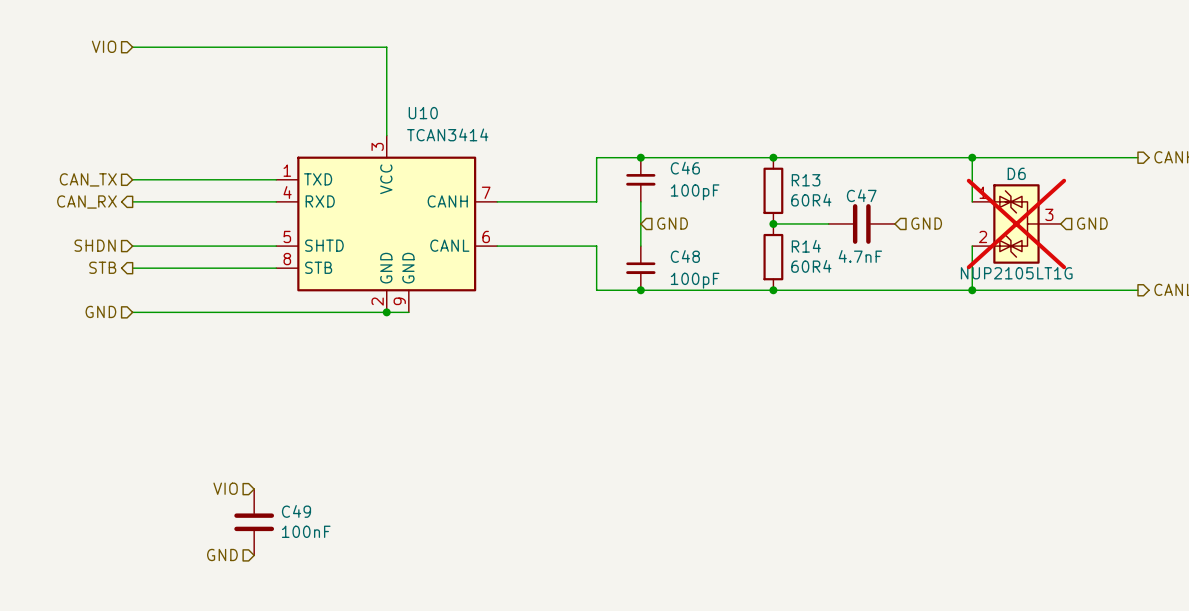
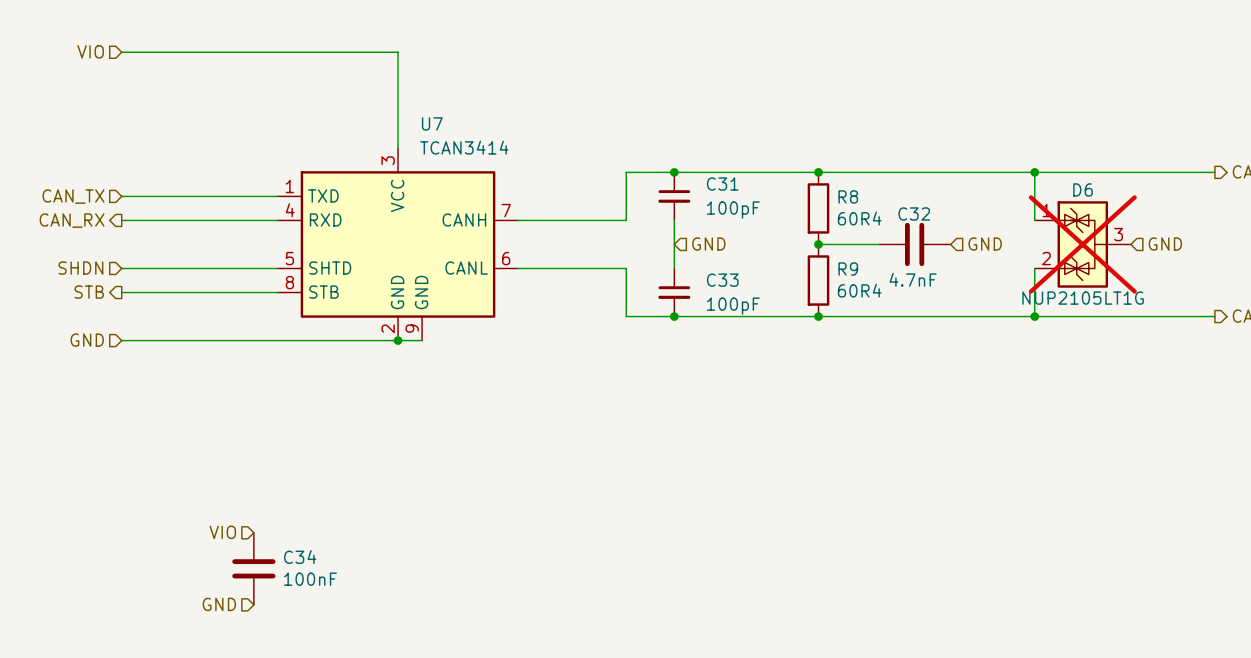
U10 name: U10 (423, 113) -> U7 (432, 123)
C46 name: C46 (685, 168) -> C31 (722, 184)
R13 name: R13 (806, 180) -> R8 (848, 196)
C47 name: C47 (861, 195) -> C32 (914, 213)
R14 name: R14 (806, 246) -> R9 (848, 269)
C48 name: C48 (685, 256) -> C33 (722, 280)
C49 name: C49 (296, 511) -> C34 (300, 557)

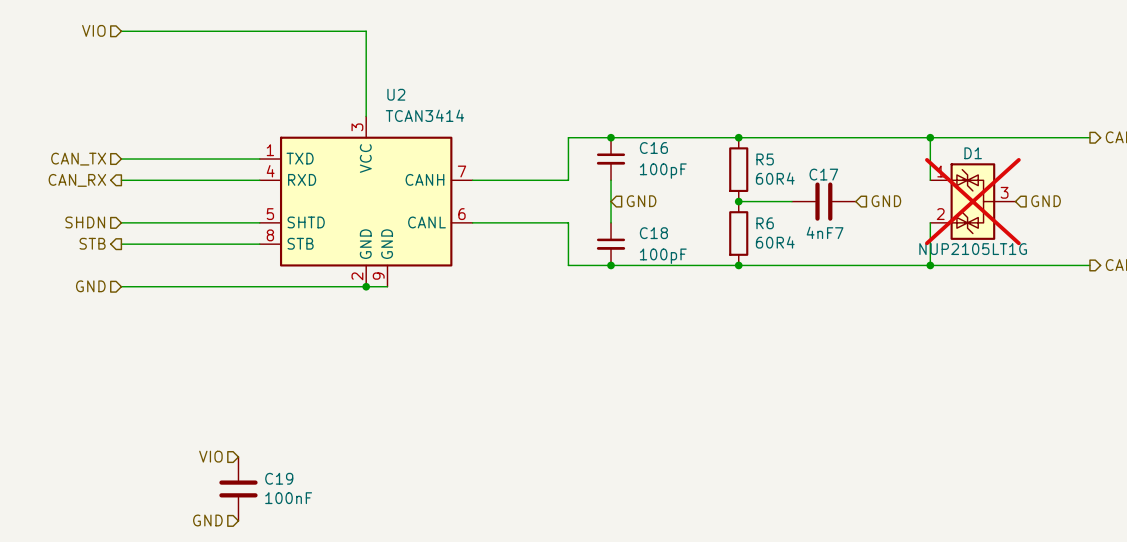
U7 name: U7 (432, 123) -> U2 (396, 94)
C31 name: C31 (722, 184) -> C16 (653, 148)
D6 name: D6 (1083, 189) -> D1 (973, 153)
R8 name: R8 (848, 196) -> R5 (765, 159)
C32 name: C32 (914, 213) -> C17 (823, 174)
R9 name: R9 (848, 269) -> R6 (765, 223)
C32 value: 4.7nF (913, 279) -> 4nF7 (825, 232)
C33 name: C33 (722, 280) -> C18 (653, 233)
C34 name: C34 (300, 557) -> C19 (279, 478)

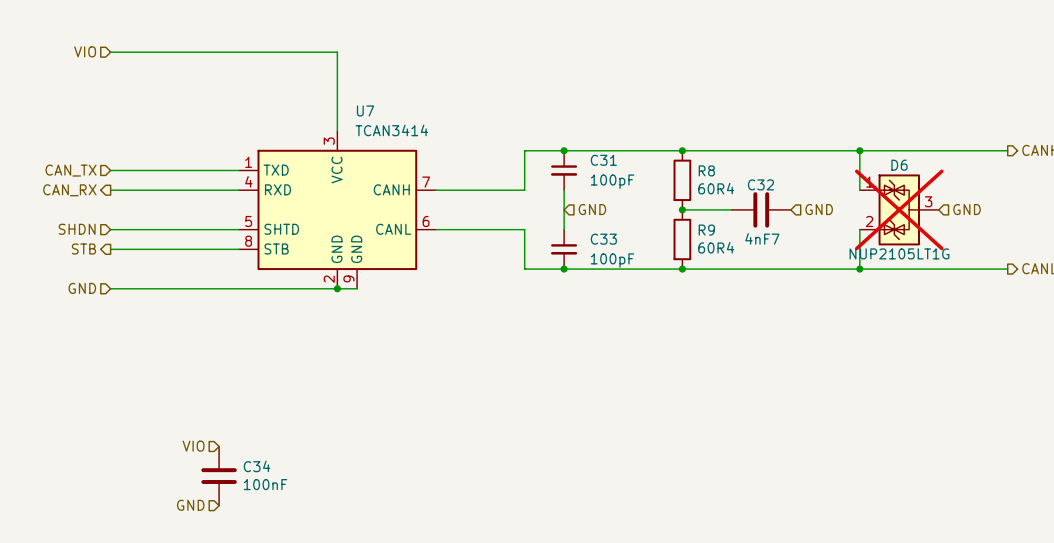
U2 name: U2 (396, 94) -> U7 (365, 110)
C16 name: C16 (653, 148) -> C31 (603, 160)
D1 name: D1 (973, 153) -> D6 (899, 165)
R5 name: R5 (765, 159) -> R8 (706, 170)
C17 name: C17 (823, 174) -> C32 (760, 184)
R6 name: R6 (765, 223) -> R9 (706, 230)
C18 name: C18 (653, 233) -> C33 (603, 239)
C19 name: C19 (279, 478) -> C34 (257, 466)

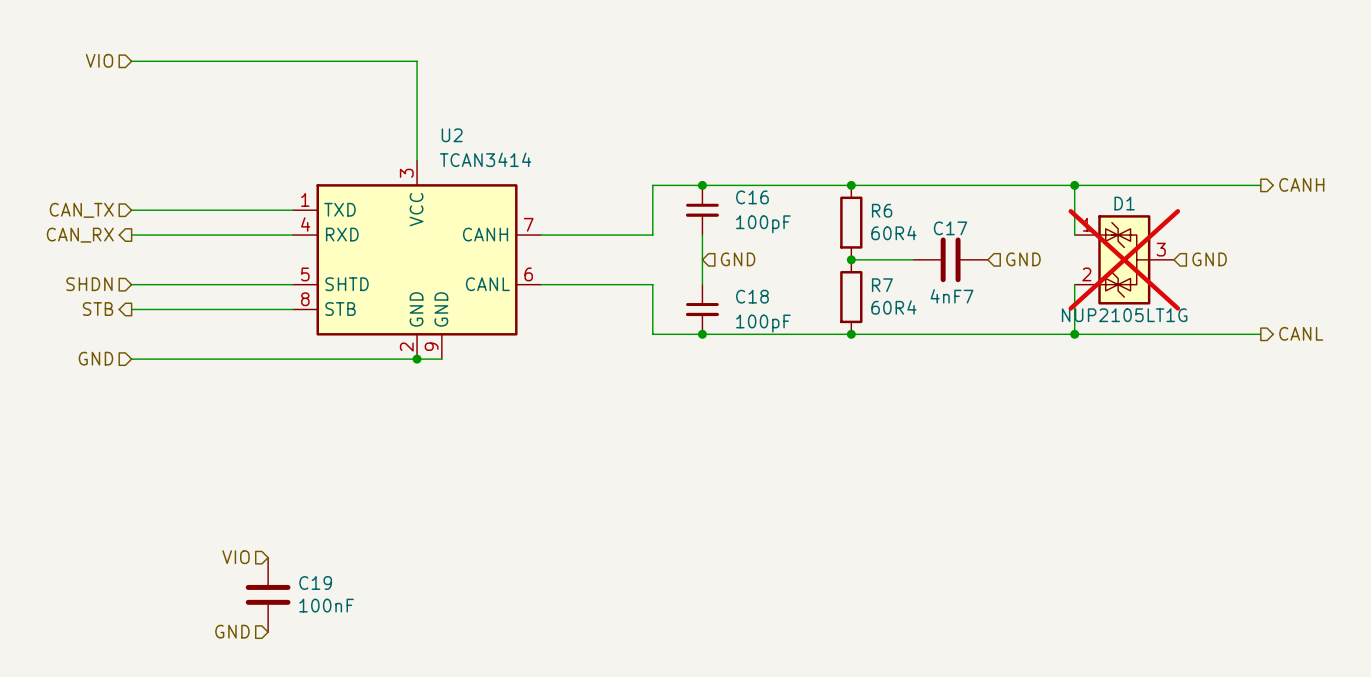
U7 name: U7 (365, 110) -> U2 (452, 135)
C31 name: C31 (603, 160) -> C16 (752, 197)
D6 name: D6 (899, 165) -> D1 (1124, 203)
R8 name: R8 (706, 170) -> R6 (882, 210)
C32 name: C32 (760, 184) -> C17 (950, 228)
R9 name: R9 (706, 230) -> R7 (882, 285)
C33 name: C33 (603, 239) -> C18 (752, 296)
C34 name: C34 (257, 466) -> C19 (315, 583)

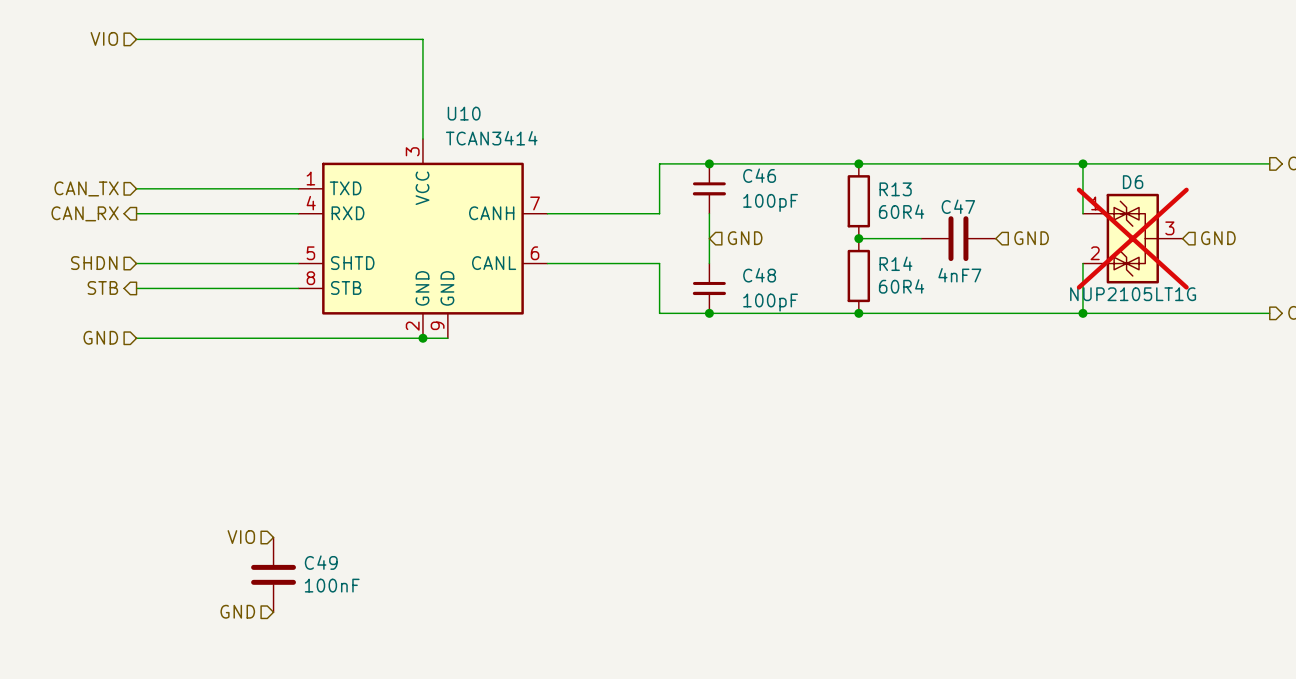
U2 name: U2 (452, 135) -> U10 (464, 113)
C16 name: C16 (752, 197) -> C46 (759, 175)
D1 name: D1 (1124, 203) -> D6 (1133, 182)
R6 name: R6 (882, 210) -> R13 (895, 189)
C17 name: C17 (950, 228) -> C47 (958, 206)
R7 name: R7 (882, 285) -> R14 (895, 263)
C18 name: C18 (752, 296) -> C48 (759, 275)
C19 name: C19 (315, 583) -> C49 (321, 562)

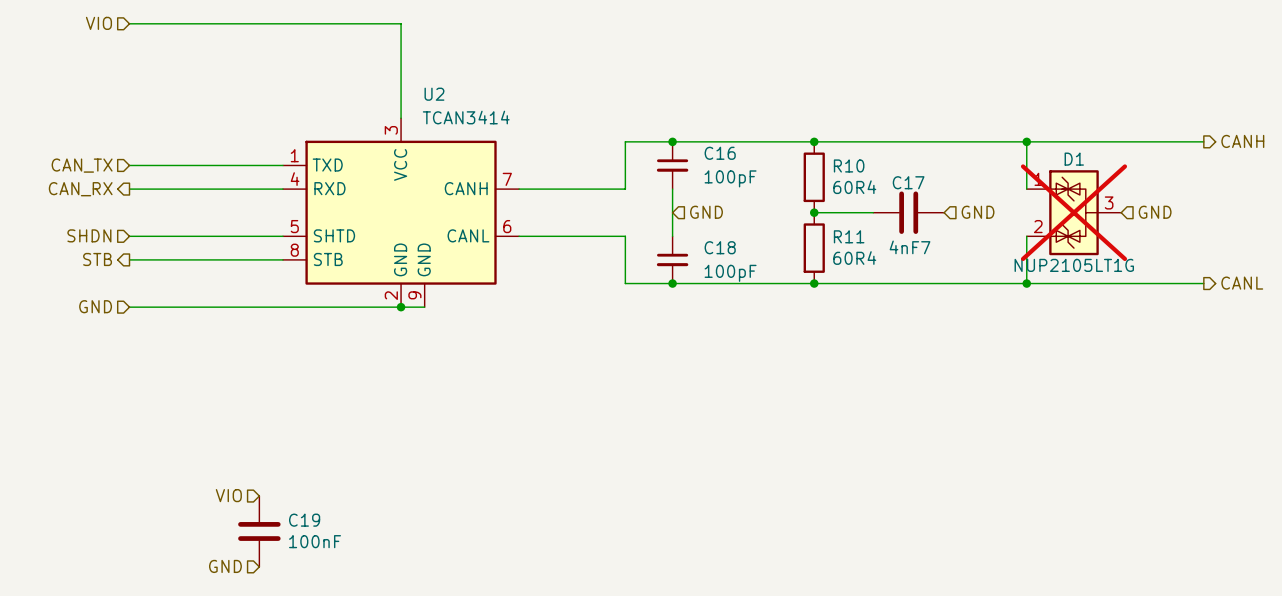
U10 name: U10 (464, 113) -> U2 (434, 94)
C46 name: C46 (759, 175) -> C16 (720, 153)
D6 name: D6 (1133, 182) -> D1 (1074, 159)
R13 name: R13 (895, 189) -> R10 (849, 165)
C47 name: C47 (958, 206) -> C17 (908, 182)
R14 name: R14 (895, 263) -> R11 (849, 236)
C48 name: C48 (759, 275) -> C18 (720, 247)
C49 name: C49 (321, 562) -> C19 (304, 520)

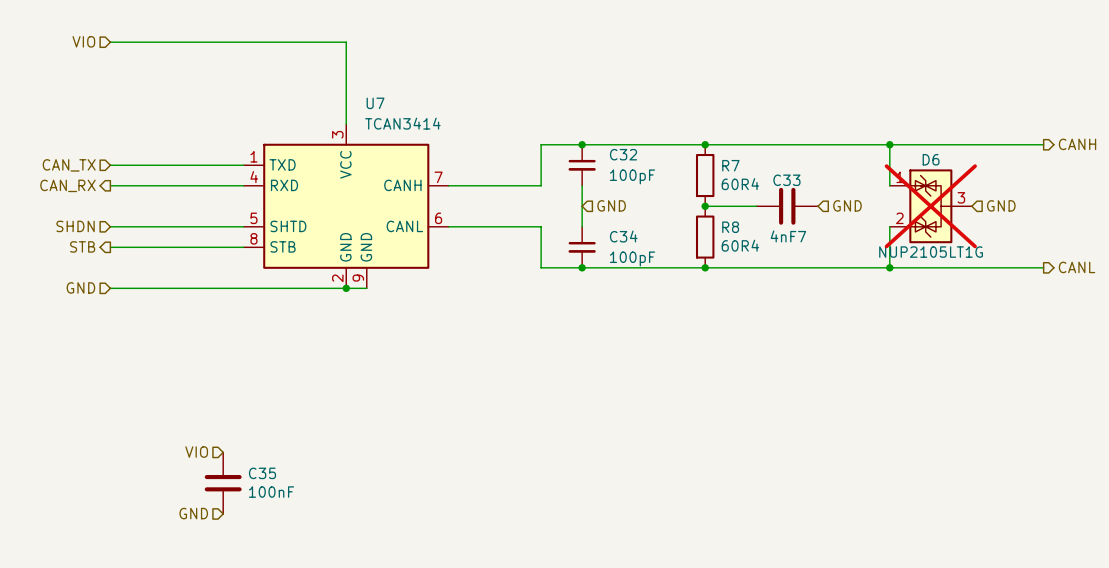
U2 name: U2 (434, 94) -> U7 (375, 103)
C16 name: C16 (720, 153) -> C32 (623, 154)
D1 name: D1 (1074, 159) -> D6 (931, 159)
R10 name: R10 (849, 165) -> R7 (730, 165)
C17 name: C17 (908, 182) -> C33 (786, 180)
R11 name: R11 (849, 236) -> R8 (730, 227)
C18 name: C18 (720, 247) -> C34 (623, 236)
C19 name: C19 (304, 520) -> C35 (262, 473)

